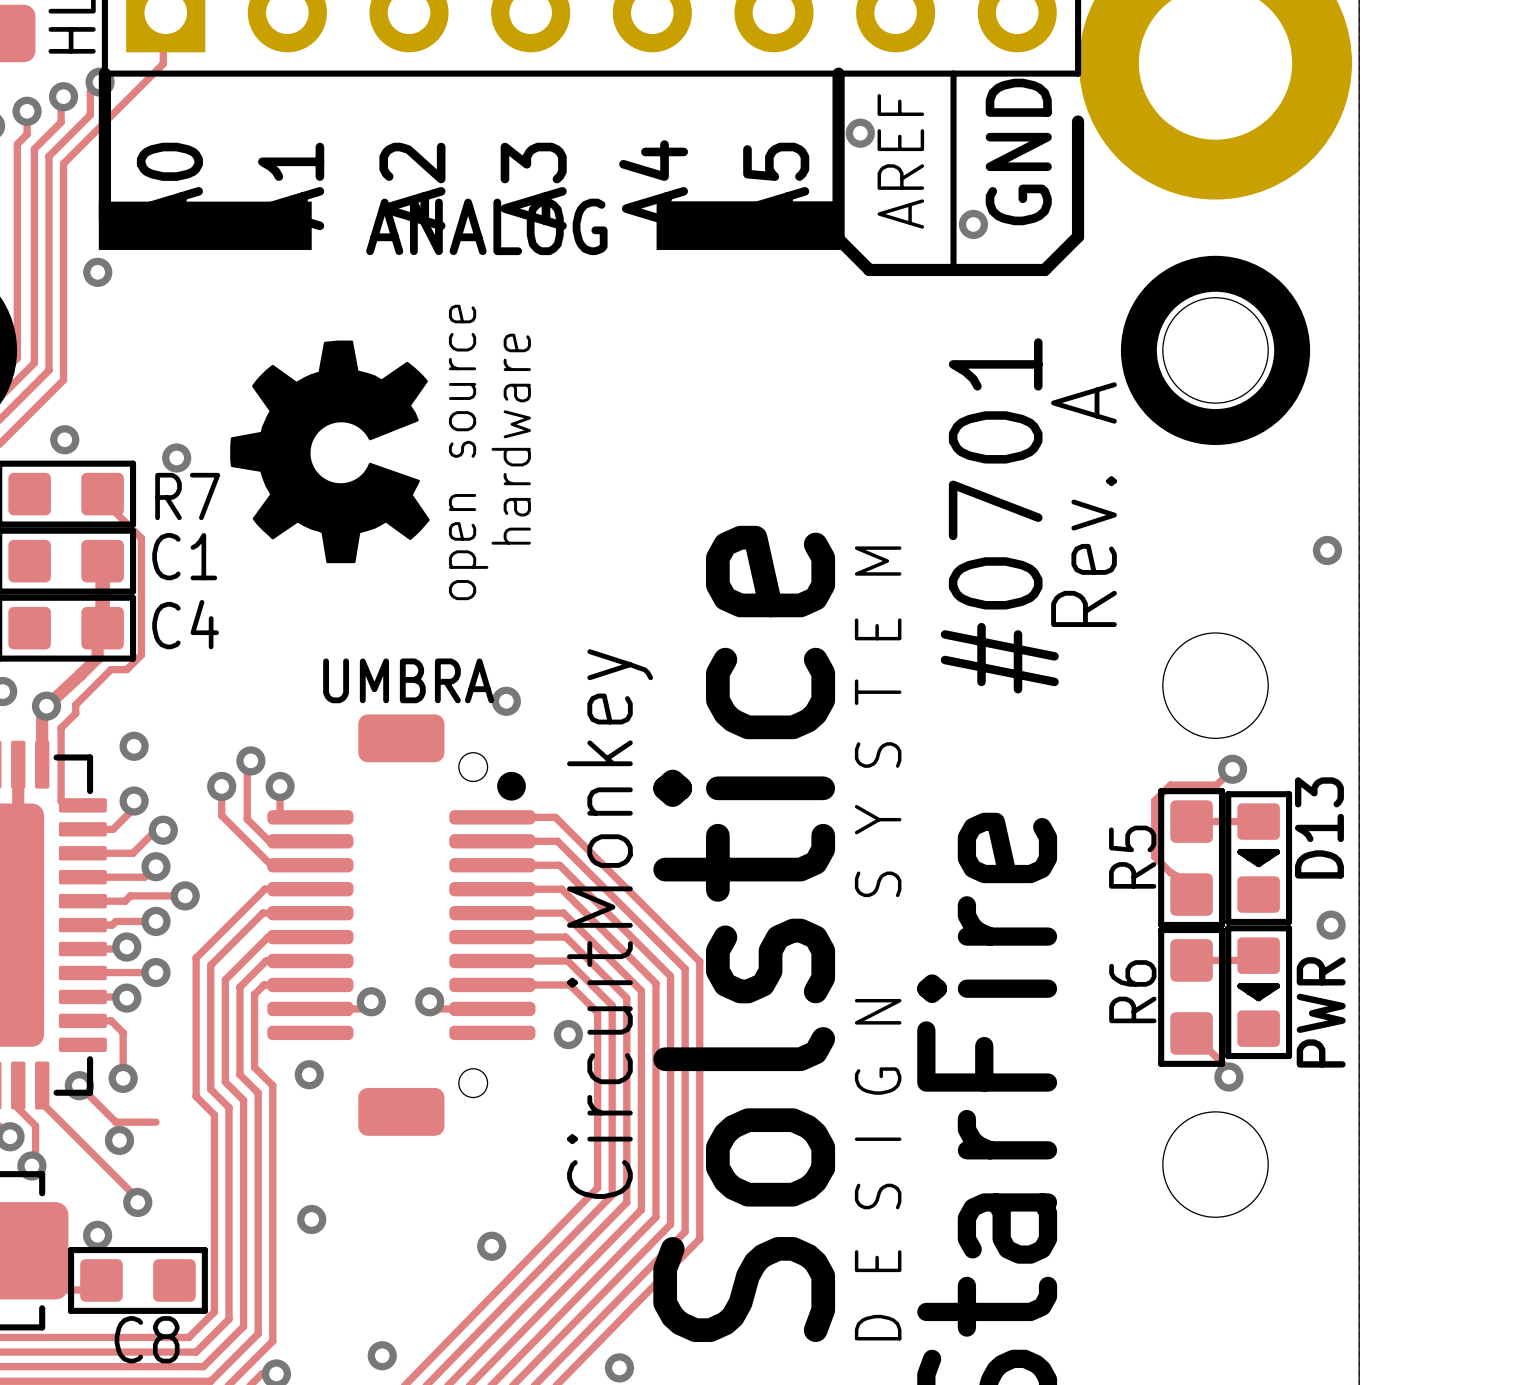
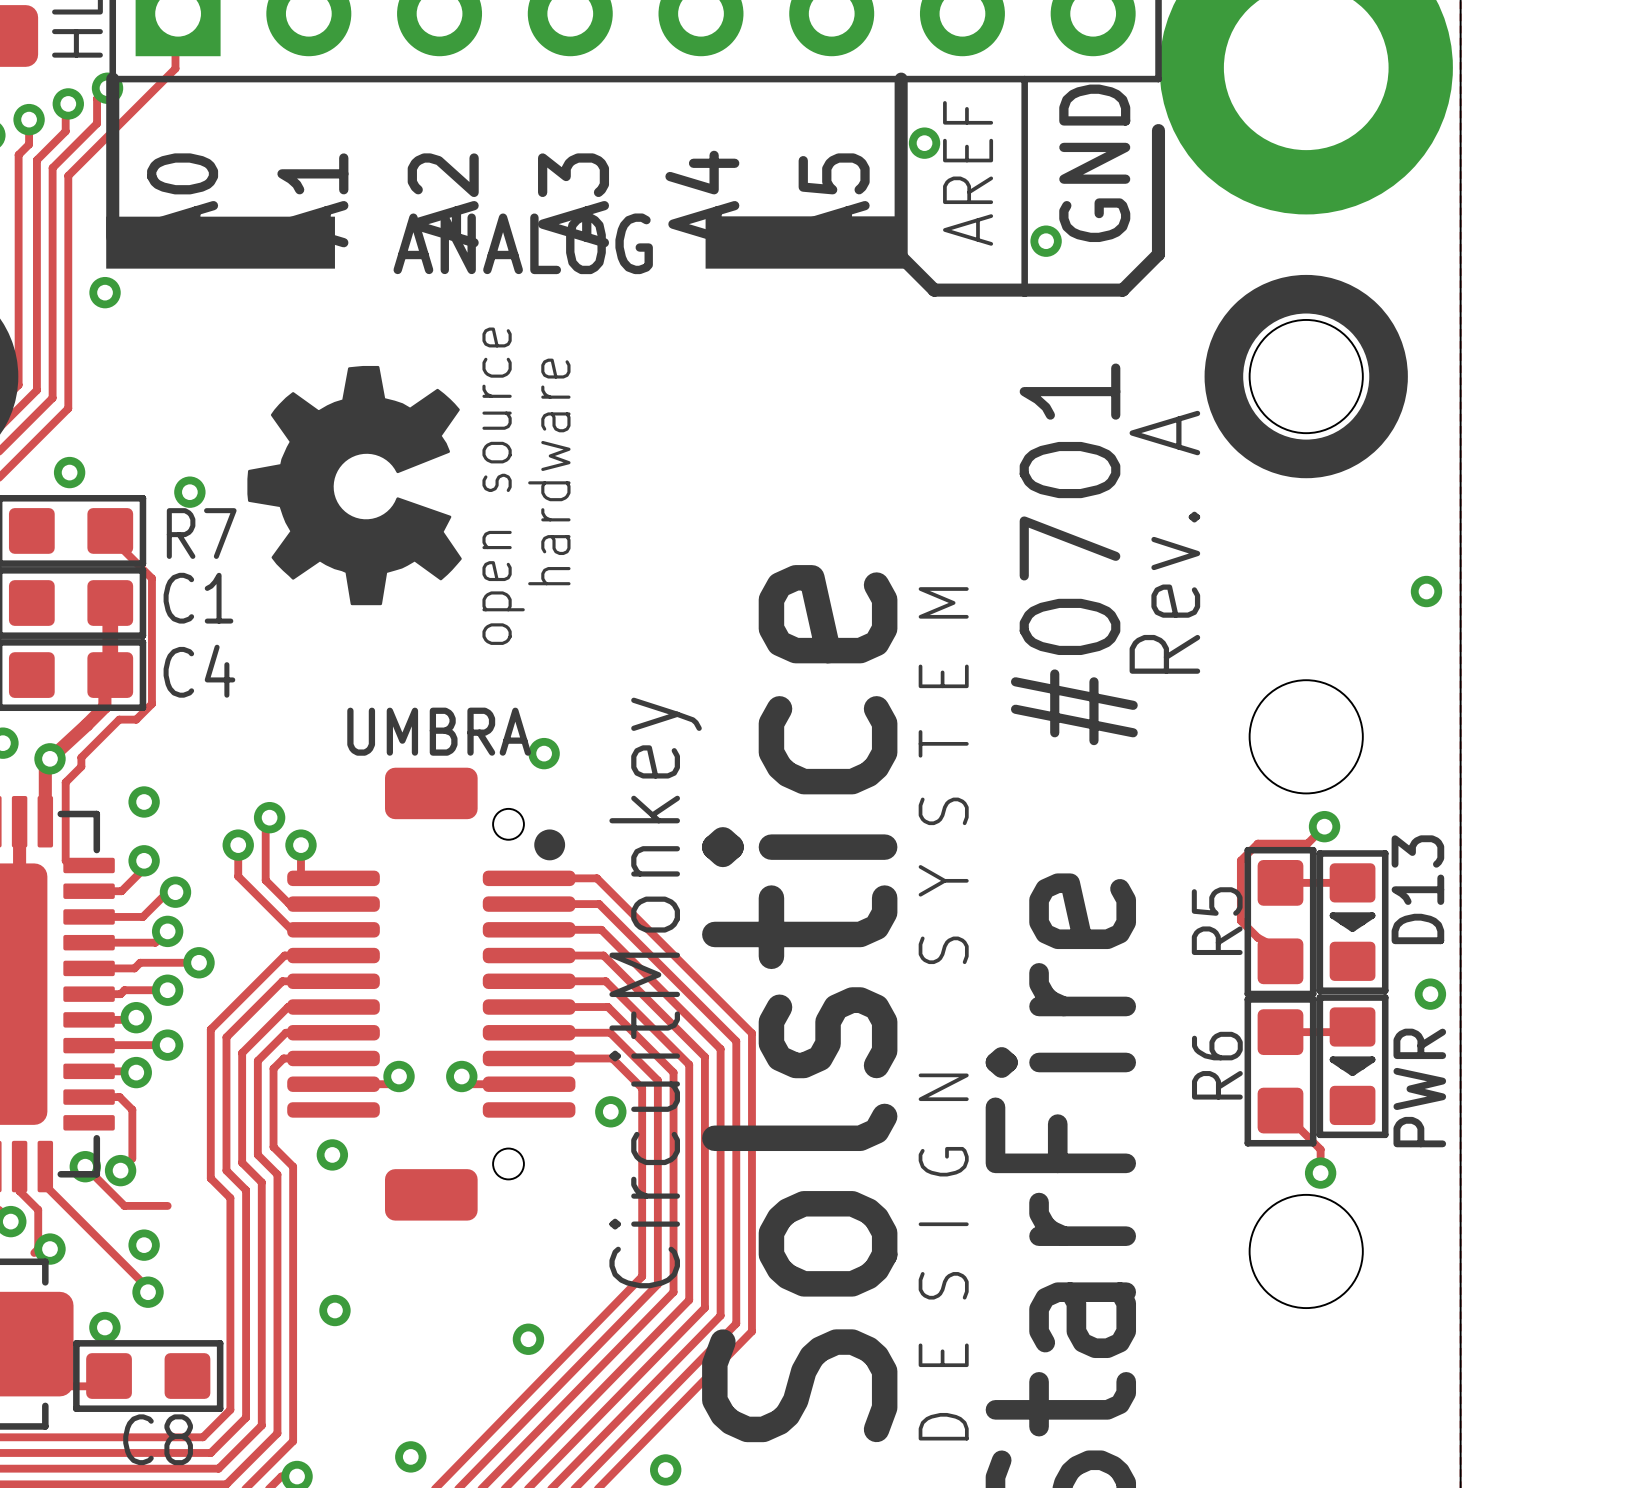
via position: (1228, 1077) -> (1320, 1173)
via position: (123, 1078) -> (120, 1170)
via position: (119, 1140) -> (144, 1245)
via position: (31, 1165) -> (49, 1249)

